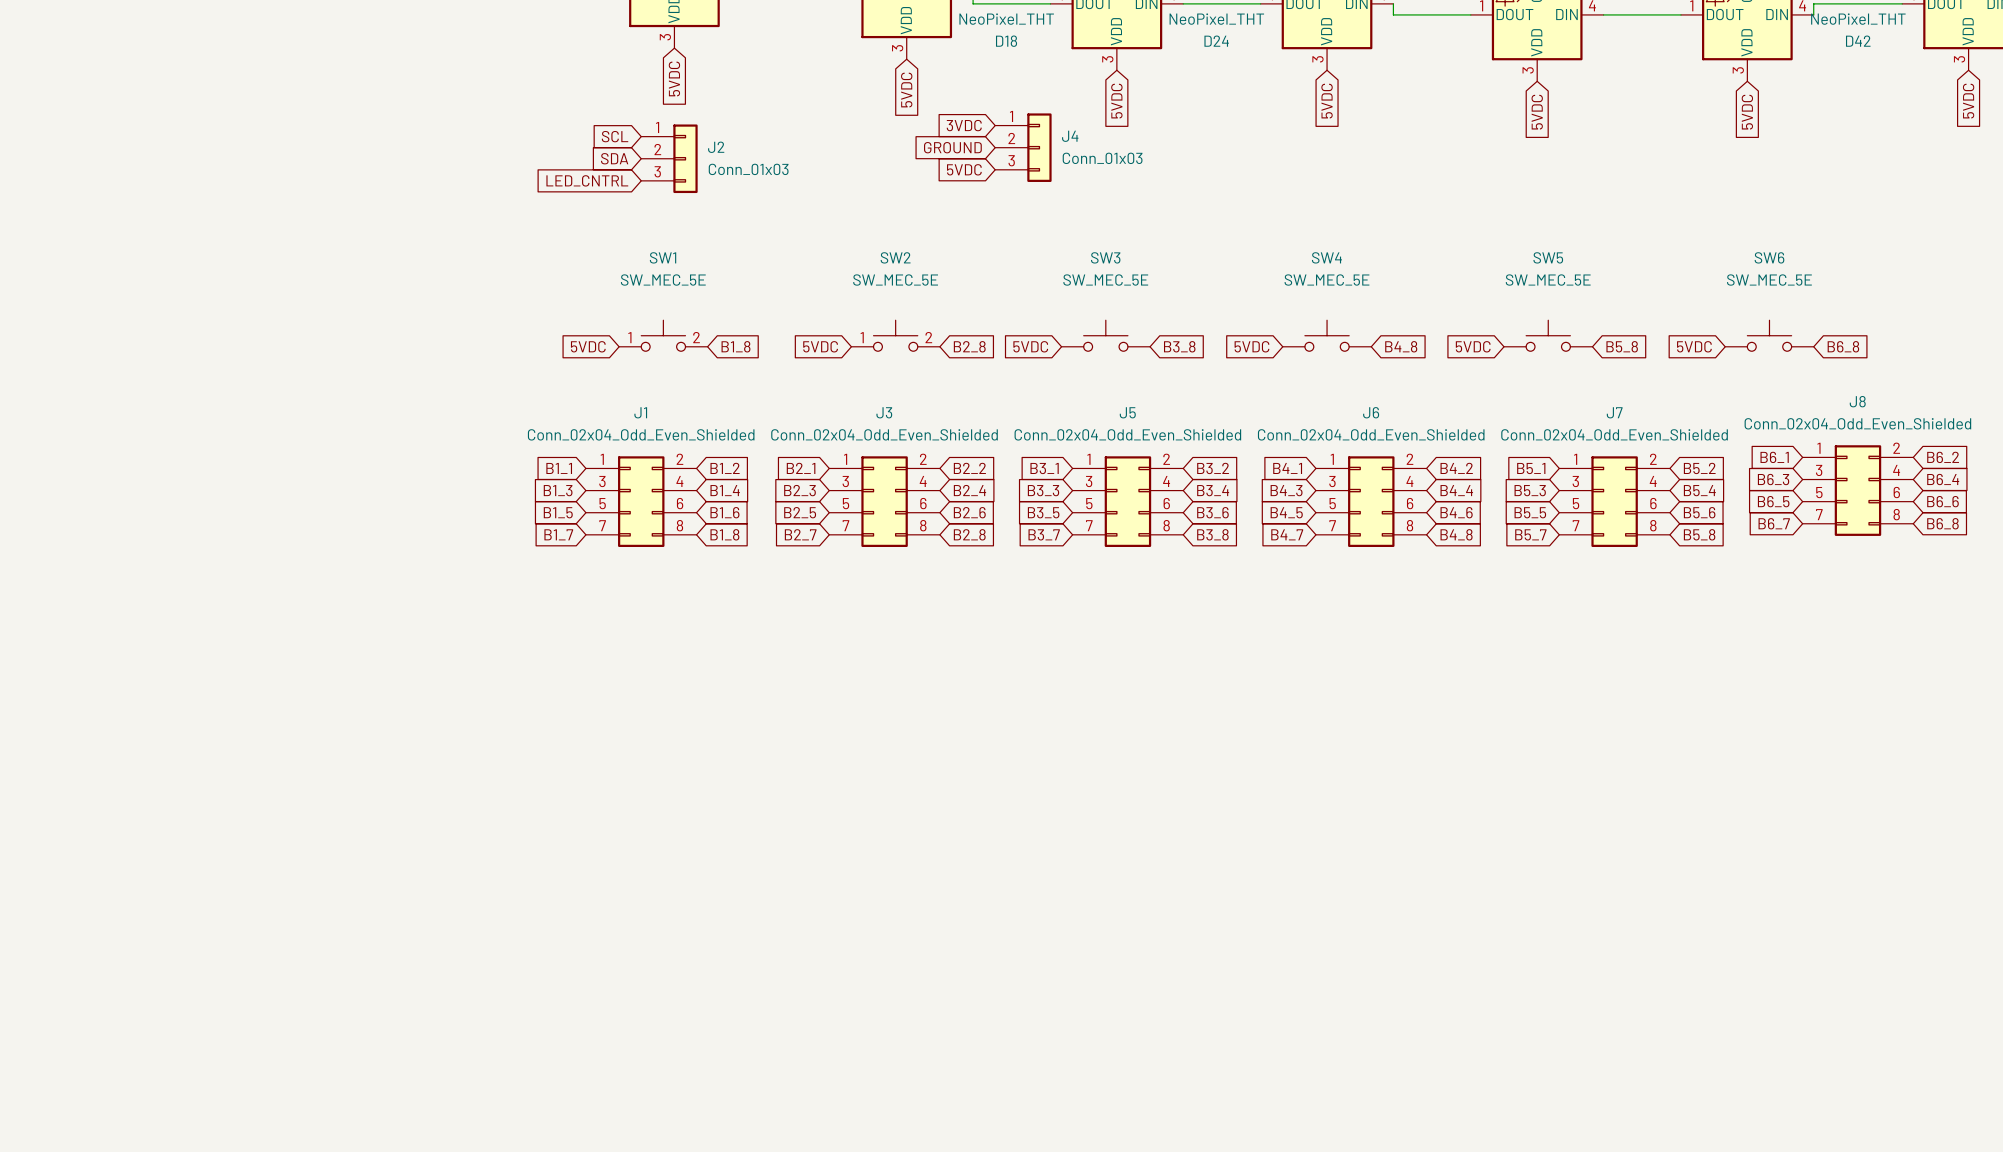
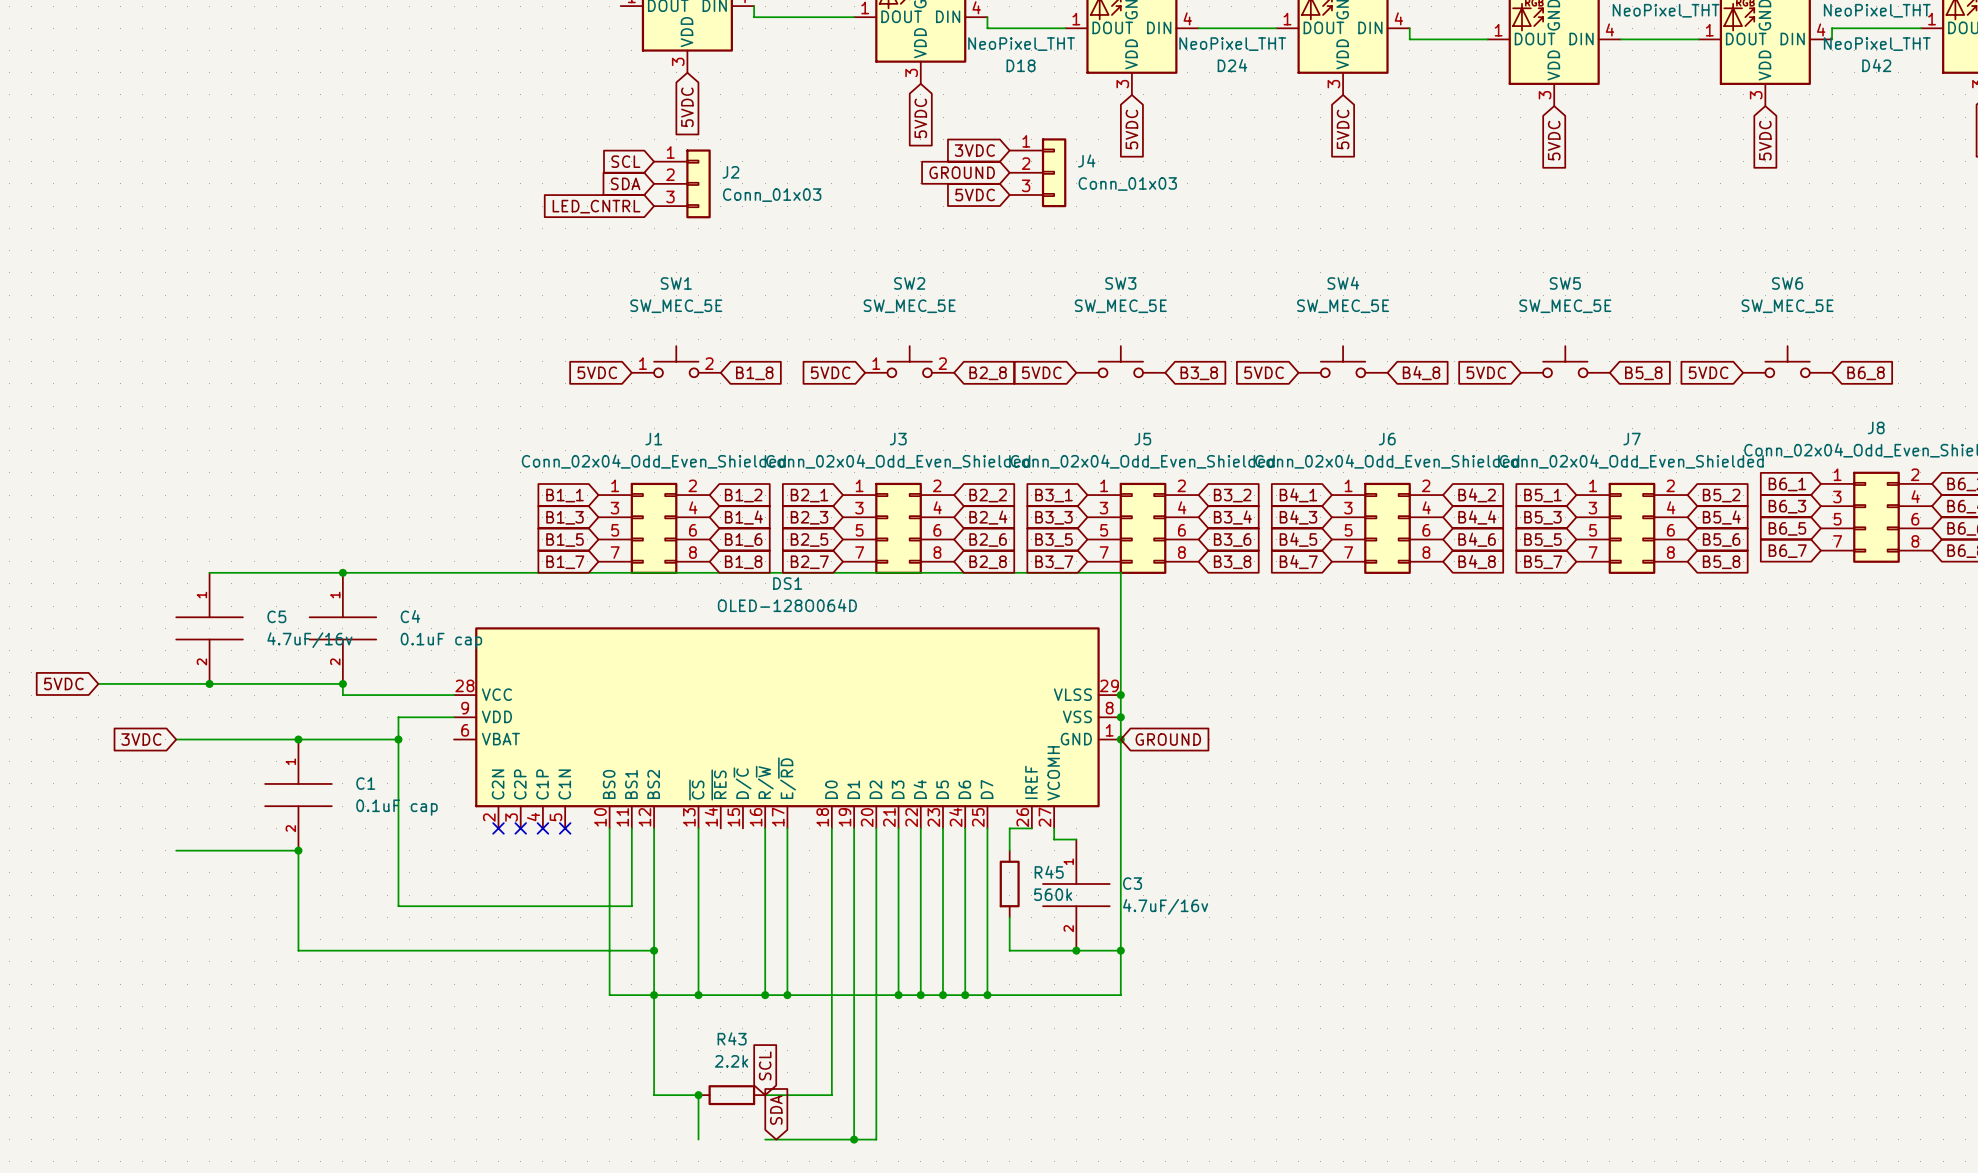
wire: none -> (209, 572) (1120, 572) (1120, 995) (609, 995) (609, 828)
junction: none -> (342, 572)
C5: none -> 4.7uF/16v (209, 628)
C4: none -> 0.1uF cap (342, 628)
global label: none -> 5VDC (63, 683)
wire: none -> (98, 683) (342, 683) (342, 695) (454, 695)
junction: none -> (209, 683)
junction: none -> (342, 683)
junction: none -> (1120, 695)
wire: none -> (454, 717) (398, 717) (398, 906) (631, 906) (631, 828)
junction: none -> (1120, 717)
DS1: none -> OLED-128O064D (787, 727)
global label: none -> 3VDC (141, 739)
wire: none -> (176, 739) (398, 739)
junction: none -> (298, 739)
junction: none -> (398, 739)
junction: none -> (1120, 739)
global label: none -> GROUND (1168, 739)
C1: none -> 0.1uF cap (298, 795)
no-connect mark: none -> (498, 828)
no-connect mark: none -> (520, 828)
no-connect mark: none -> (542, 828)
no-connect mark: none -> (565, 828)
wire: none -> (654, 828) (654, 1095) (698, 1095) (698, 1139)
wire: none -> (698, 828) (698, 995)
wire: none -> (765, 828) (765, 995)
wire: none -> (787, 828) (787, 995)
wire: none -> (831, 828) (831, 1095) (765, 1095)
wire: none -> (854, 828) (854, 1139)
wire: none -> (876, 828) (876, 1139) (765, 1139)
wire: none -> (898, 828) (898, 995)
wire: none -> (920, 828) (920, 995)
wire: none -> (943, 828) (943, 995)
wire: none -> (965, 828) (965, 995)
wire: none -> (987, 828) (987, 995)
wire: none -> (1031, 828) (1009, 828) (1009, 850)
wire: none -> (1054, 828) (1054, 839) (1076, 839)
wire: none -> (176, 850) (298, 850) (298, 950) (654, 950)
junction: none -> (298, 850)
R45: none -> 560k (1009, 883)
C3: none -> 4.7uF/16v (1076, 895)
wire: none -> (1009, 917) (1009, 950) (1120, 950)
junction: none -> (654, 950)
junction: none -> (1076, 950)
junction: none -> (1120, 950)
junction: none -> (654, 995)
junction: none -> (698, 995)
junction: none -> (765, 995)
junction: none -> (787, 995)
junction: none -> (898, 995)
junction: none -> (920, 995)
junction: none -> (943, 995)
junction: none -> (965, 995)
junction: none -> (987, 995)
global label: none -> SCL (765, 1065)
junction: none -> (698, 1095)
R43: none -> 2.2k (731, 1095)
global label: none -> SDA (776, 1110)
junction: none -> (854, 1139)

